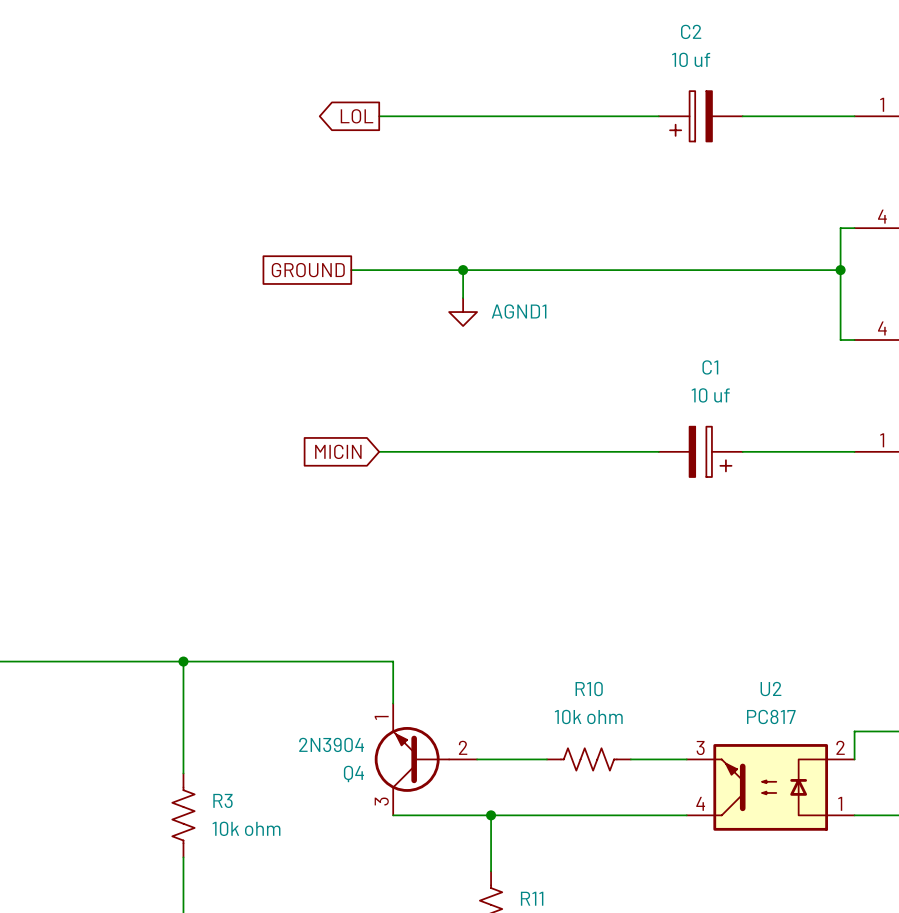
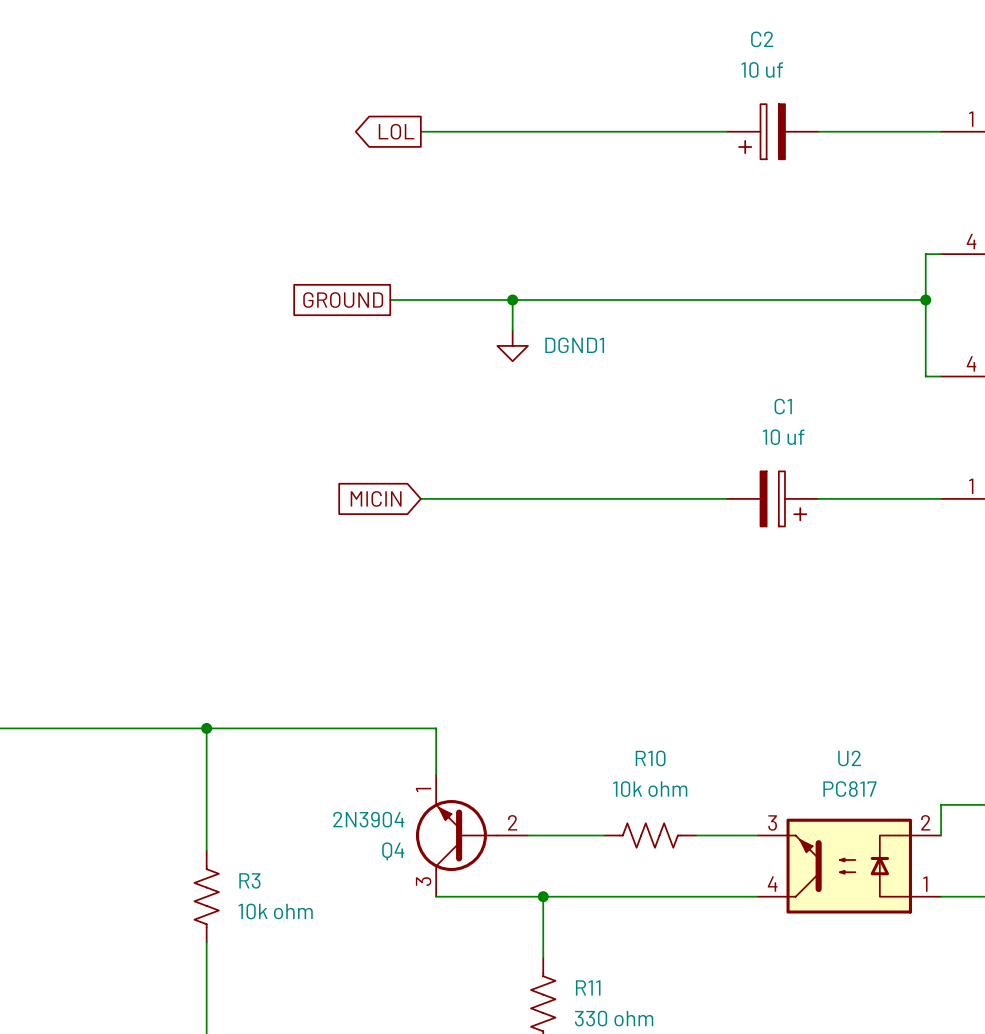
power symbol: AGND1 (463, 312) -> DGND1 (512, 345)

